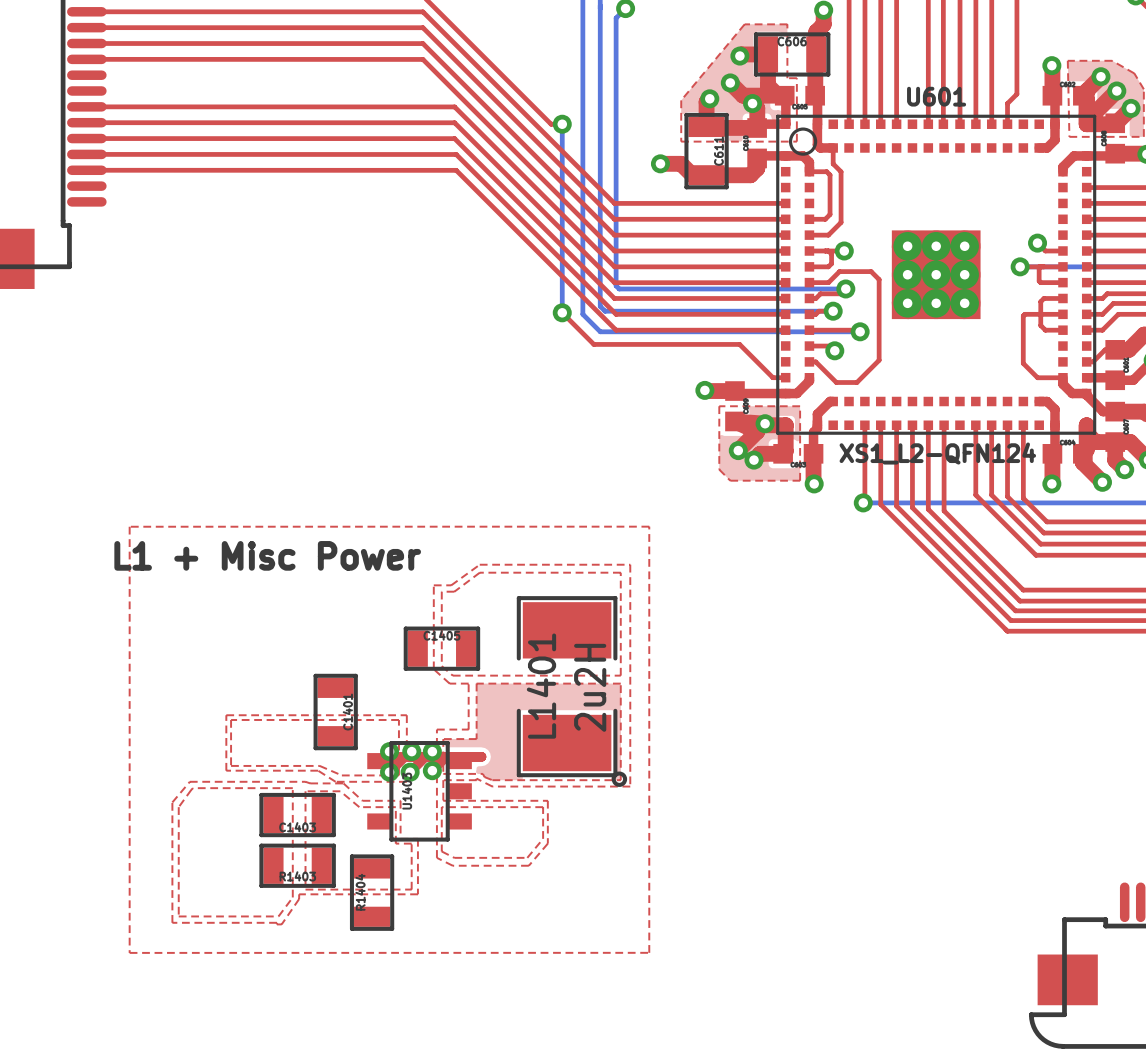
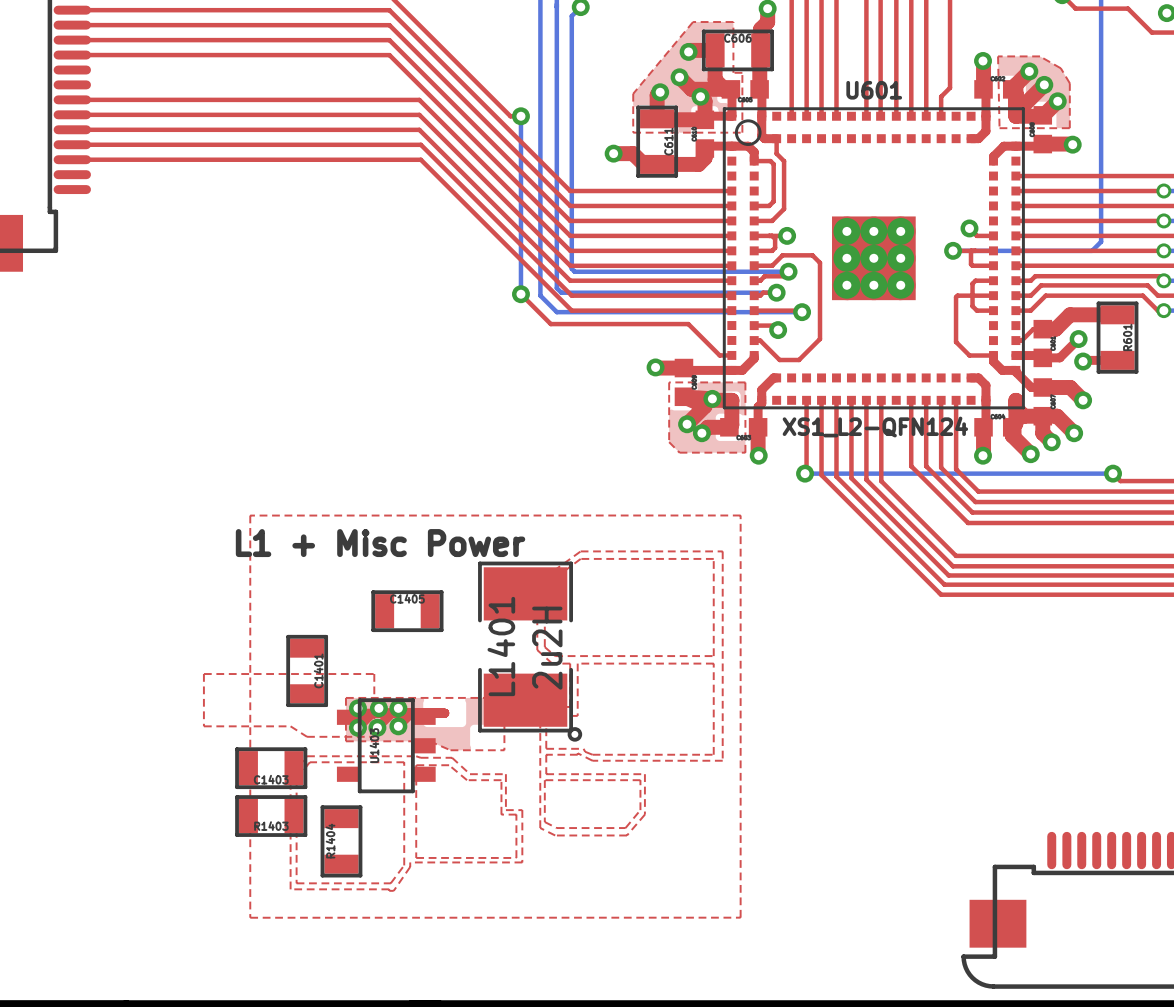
top zone outline: (129, 526) (649, 526) (649, 952) (129, 952) (129, 526) -> (250, 515) (740, 515) (740, 917) (250, 917) (250, 515)
text position: L1 + Misc Power (267, 555) -> L1 + Misc Power (380, 543)
top zone outline: (479, 564) (451, 585) (433, 585) (433, 669) (449, 683) (468, 683) (468, 729) (436, 729) (436, 857) (452, 865) (528, 865) (547, 843) (547, 800) (443, 800) (443, 780) (476, 780) (476, 778) (492, 786) (630, 786) (630, 564) (479, 564) -> (580, 551) (553, 570) (537, 570) (537, 650) (552, 663) (570, 663) (570, 706) (540, 706) (540, 828) (555, 835) (627, 835) (644, 814) (644, 774) (546, 774) (546, 754) (577, 753) (592, 760) (722, 760) (722, 551) (580, 551)
top zone outline: (479, 572) (620, 572) (620, 675) (452, 675) (441, 666) (441, 591) (454, 591) (479, 572) -> (580, 558) (713, 558) (713, 656) (555, 656) (544, 647) (544, 576) (556, 576) (580, 558)
top zone outline: (476, 683) (620, 683) (620, 780) (492, 780) (484, 777) (482, 773) (443, 773) (443, 739) (476, 739) (476, 683) -> (577, 663) (713, 663) (713, 754) (592, 754) (585, 751) (583, 748) (546, 748) (546, 715) (577, 715) (577, 663)
top zone outline: (231, 719) (398, 719) (398, 775) (341, 775) (319, 765) (231, 765) (231, 719) -> (345, 697) (504, 697) (504, 750) (450, 750) (429, 741) (345, 741) (345, 697)
top zone outline: (189, 781) (172, 802) (172, 922) (276, 922) (276, 924) (281, 924) (299, 899) (299, 894) (417, 894) (417, 838) (400, 838) (400, 800) (362, 800) (343, 783) (189, 781) -> (307, 756) (290, 775) (290, 889) (393, 890) (410, 866) (410, 862) (522, 862) (522, 810) (505, 810) (505, 774) (470, 774) (452, 757) (307, 756)
top zone outline: (192, 788) (292, 788) (292, 897) (278, 916) (178, 916) (178, 807) (192, 788) -> (310, 762) (404, 762) (404, 865) (390, 883) (296, 883) (296, 780) (310, 762)
top zone outline: (305, 791) (340, 791) (359, 807) (395, 807) (395, 843) (411, 843) (411, 889) (305, 889) (305, 791) -> (416, 765) (449, 765) (467, 780) (501, 780) (501, 814) (516, 814) (516, 857) (416, 857) (416, 765)
top zone outline: (441, 807) (543, 807) (543, 838) (527, 857) (454, 857) (441, 851) (441, 807) -> (544, 780) (640, 780) (640, 810) (625, 828) (556, 828) (544, 822) (544, 780)

